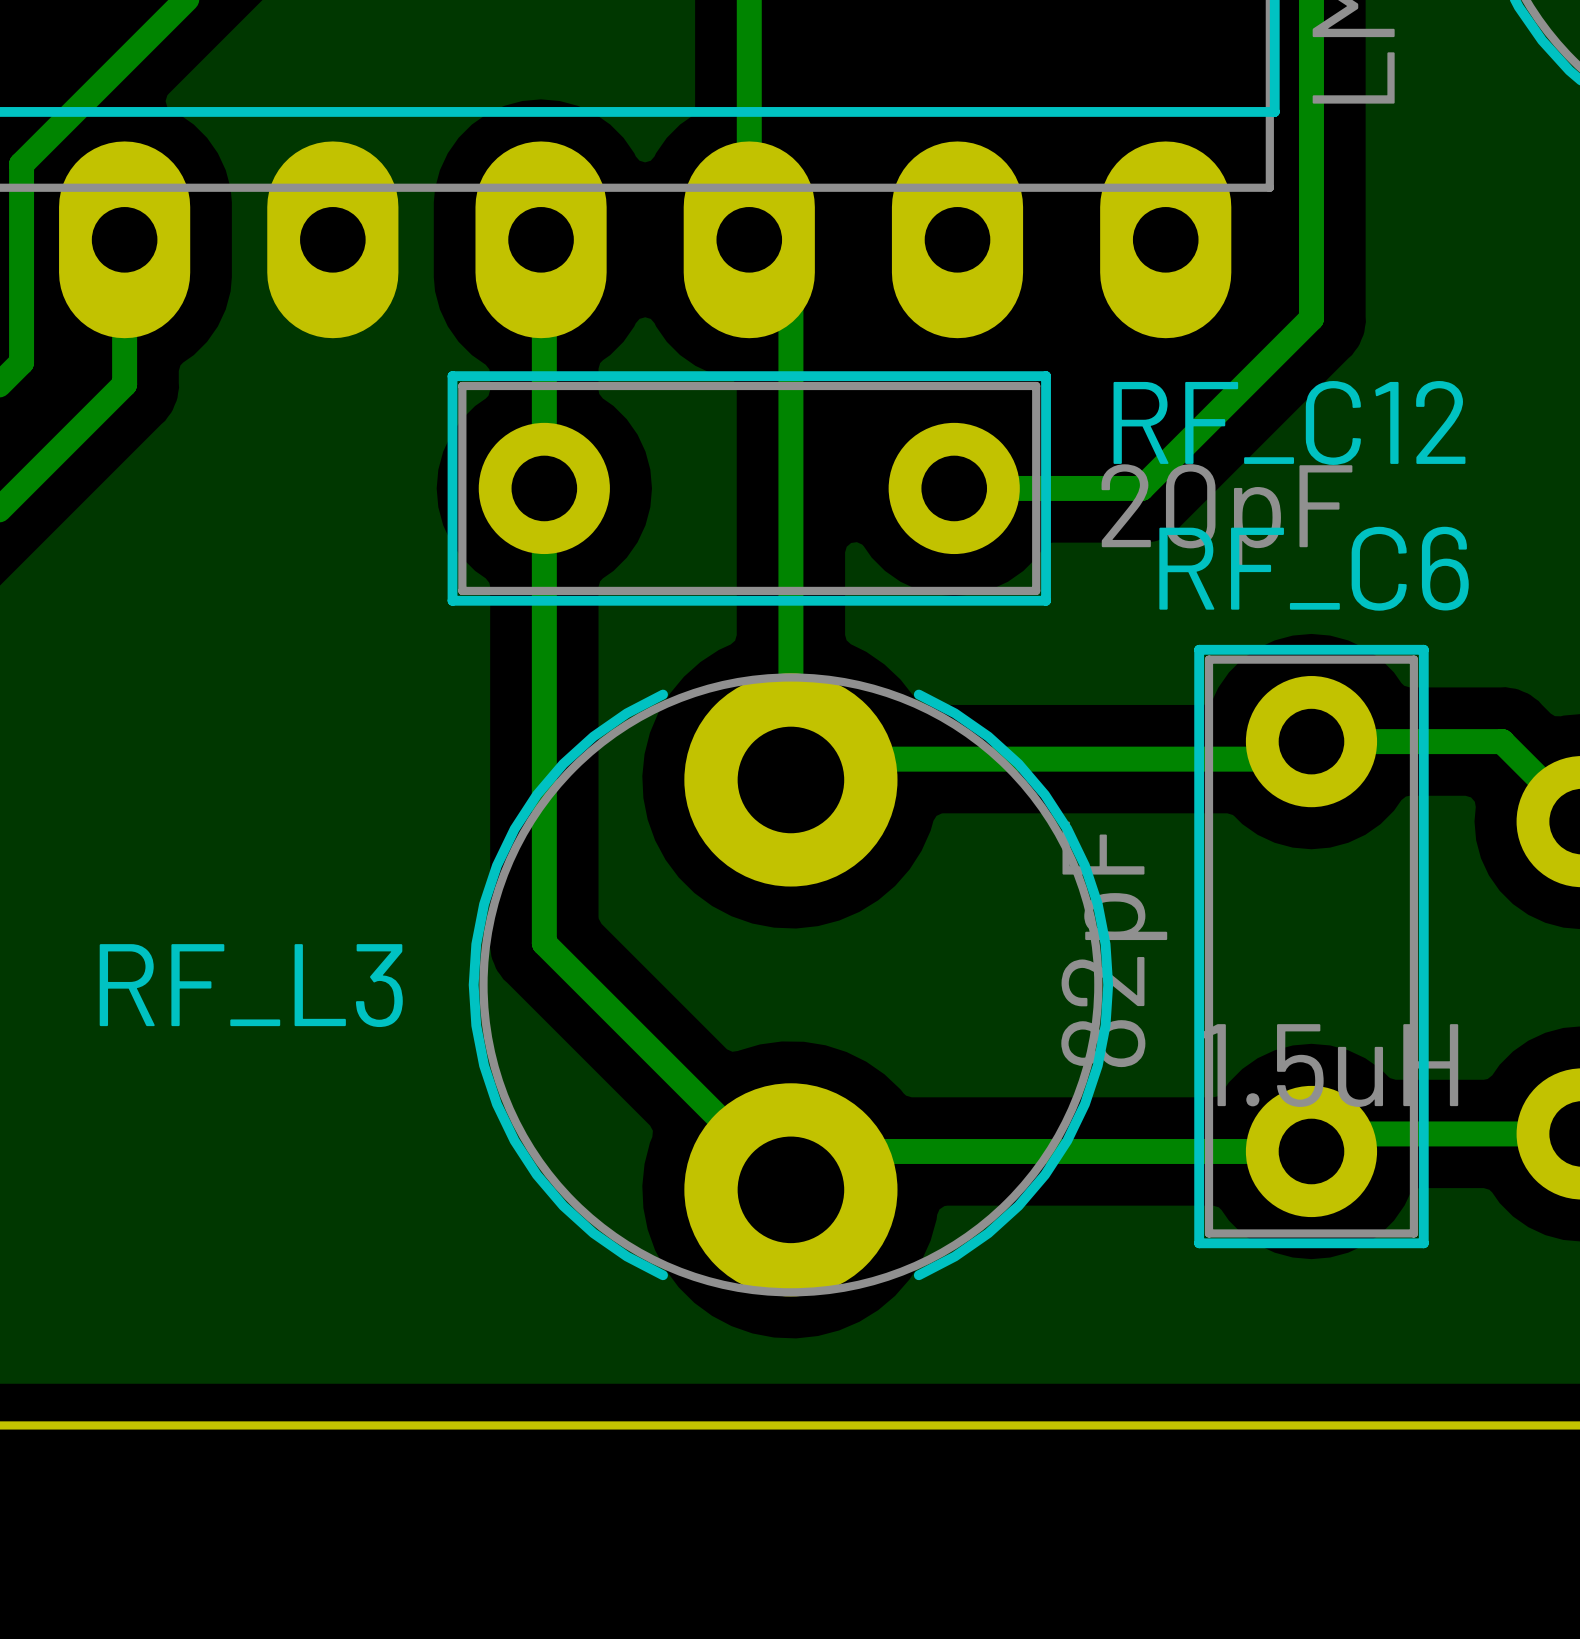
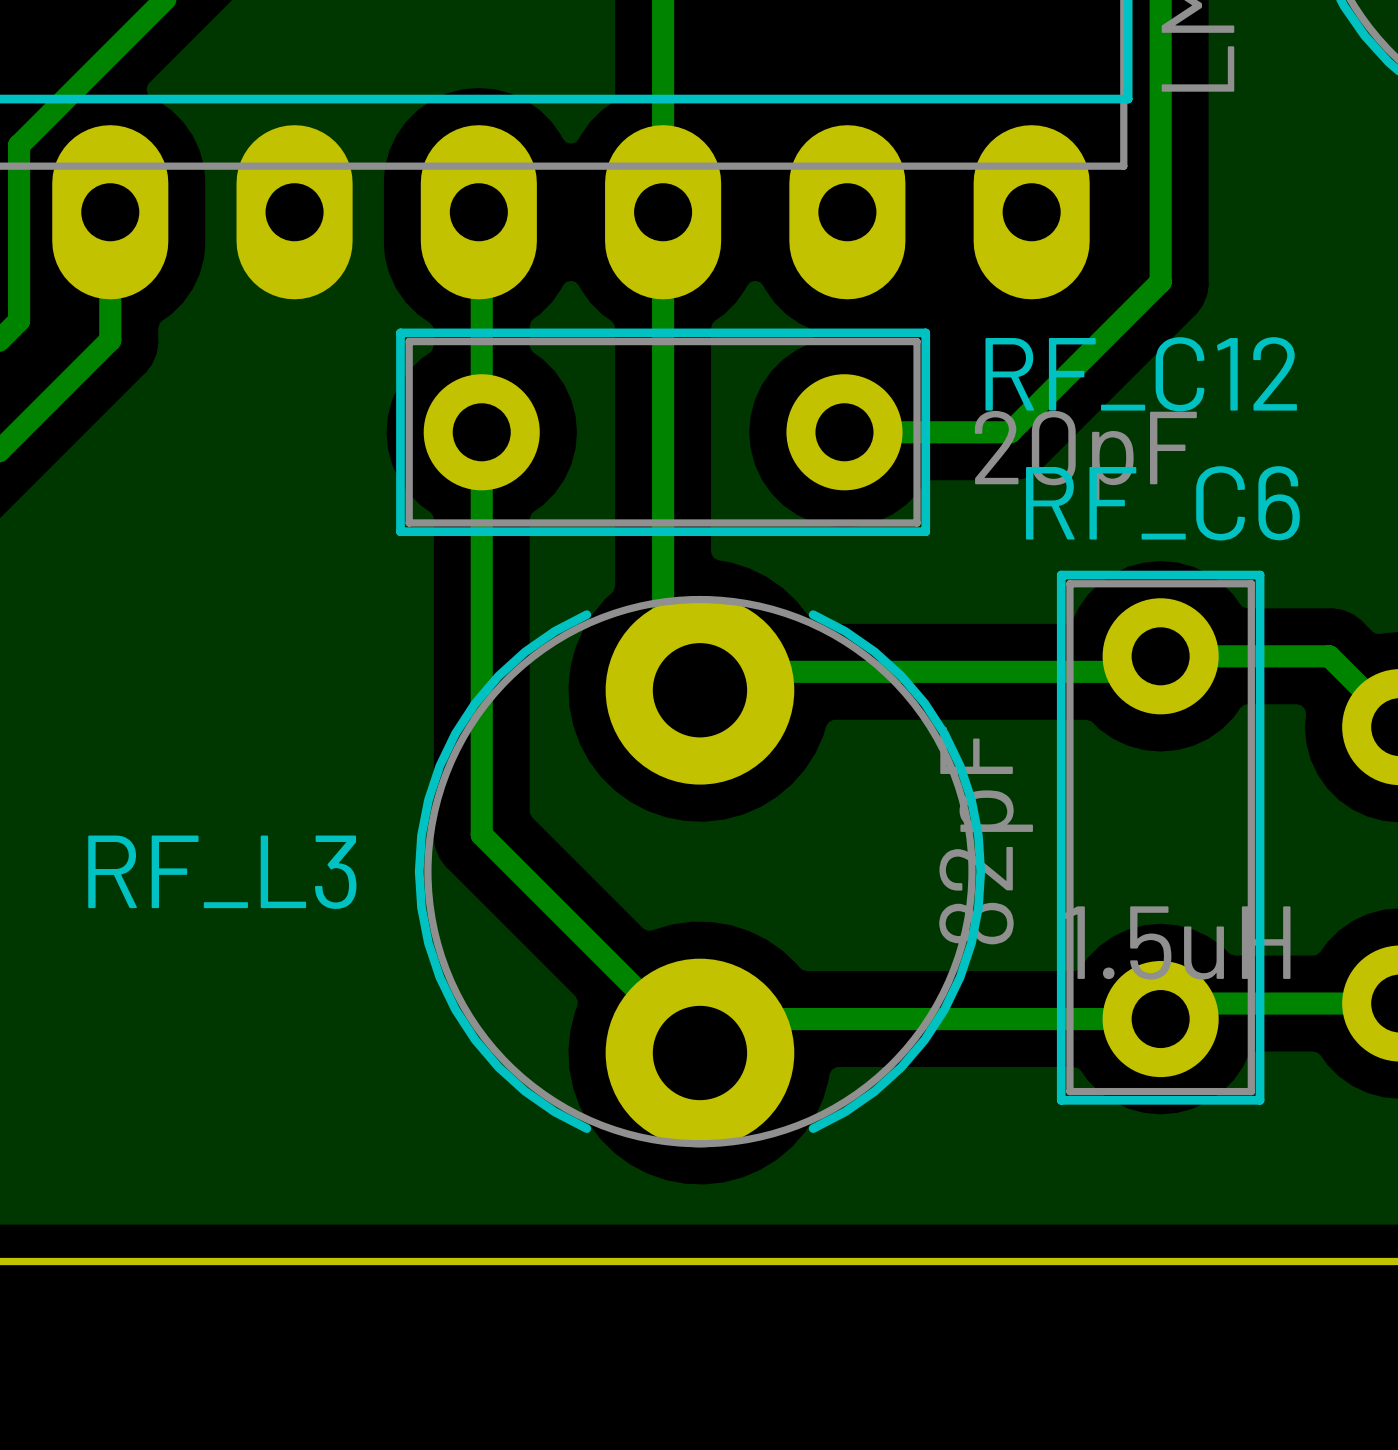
bottom track: (749, 239) (790, 281) (790, 779) -> (663, 212) (663, 653) (699, 690)

